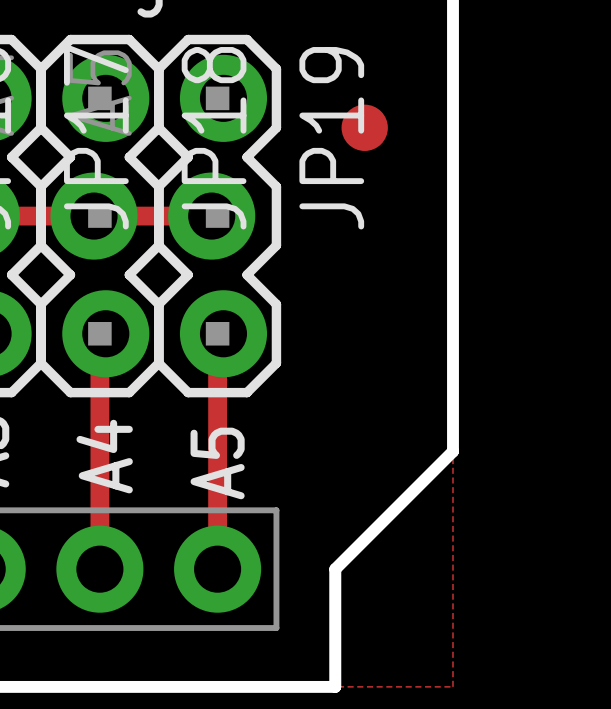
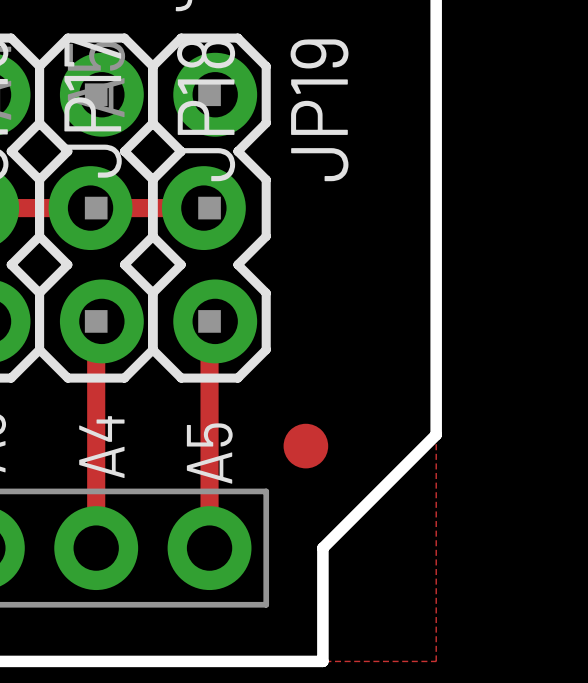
part position: (364, 127) -> (305, 446)

